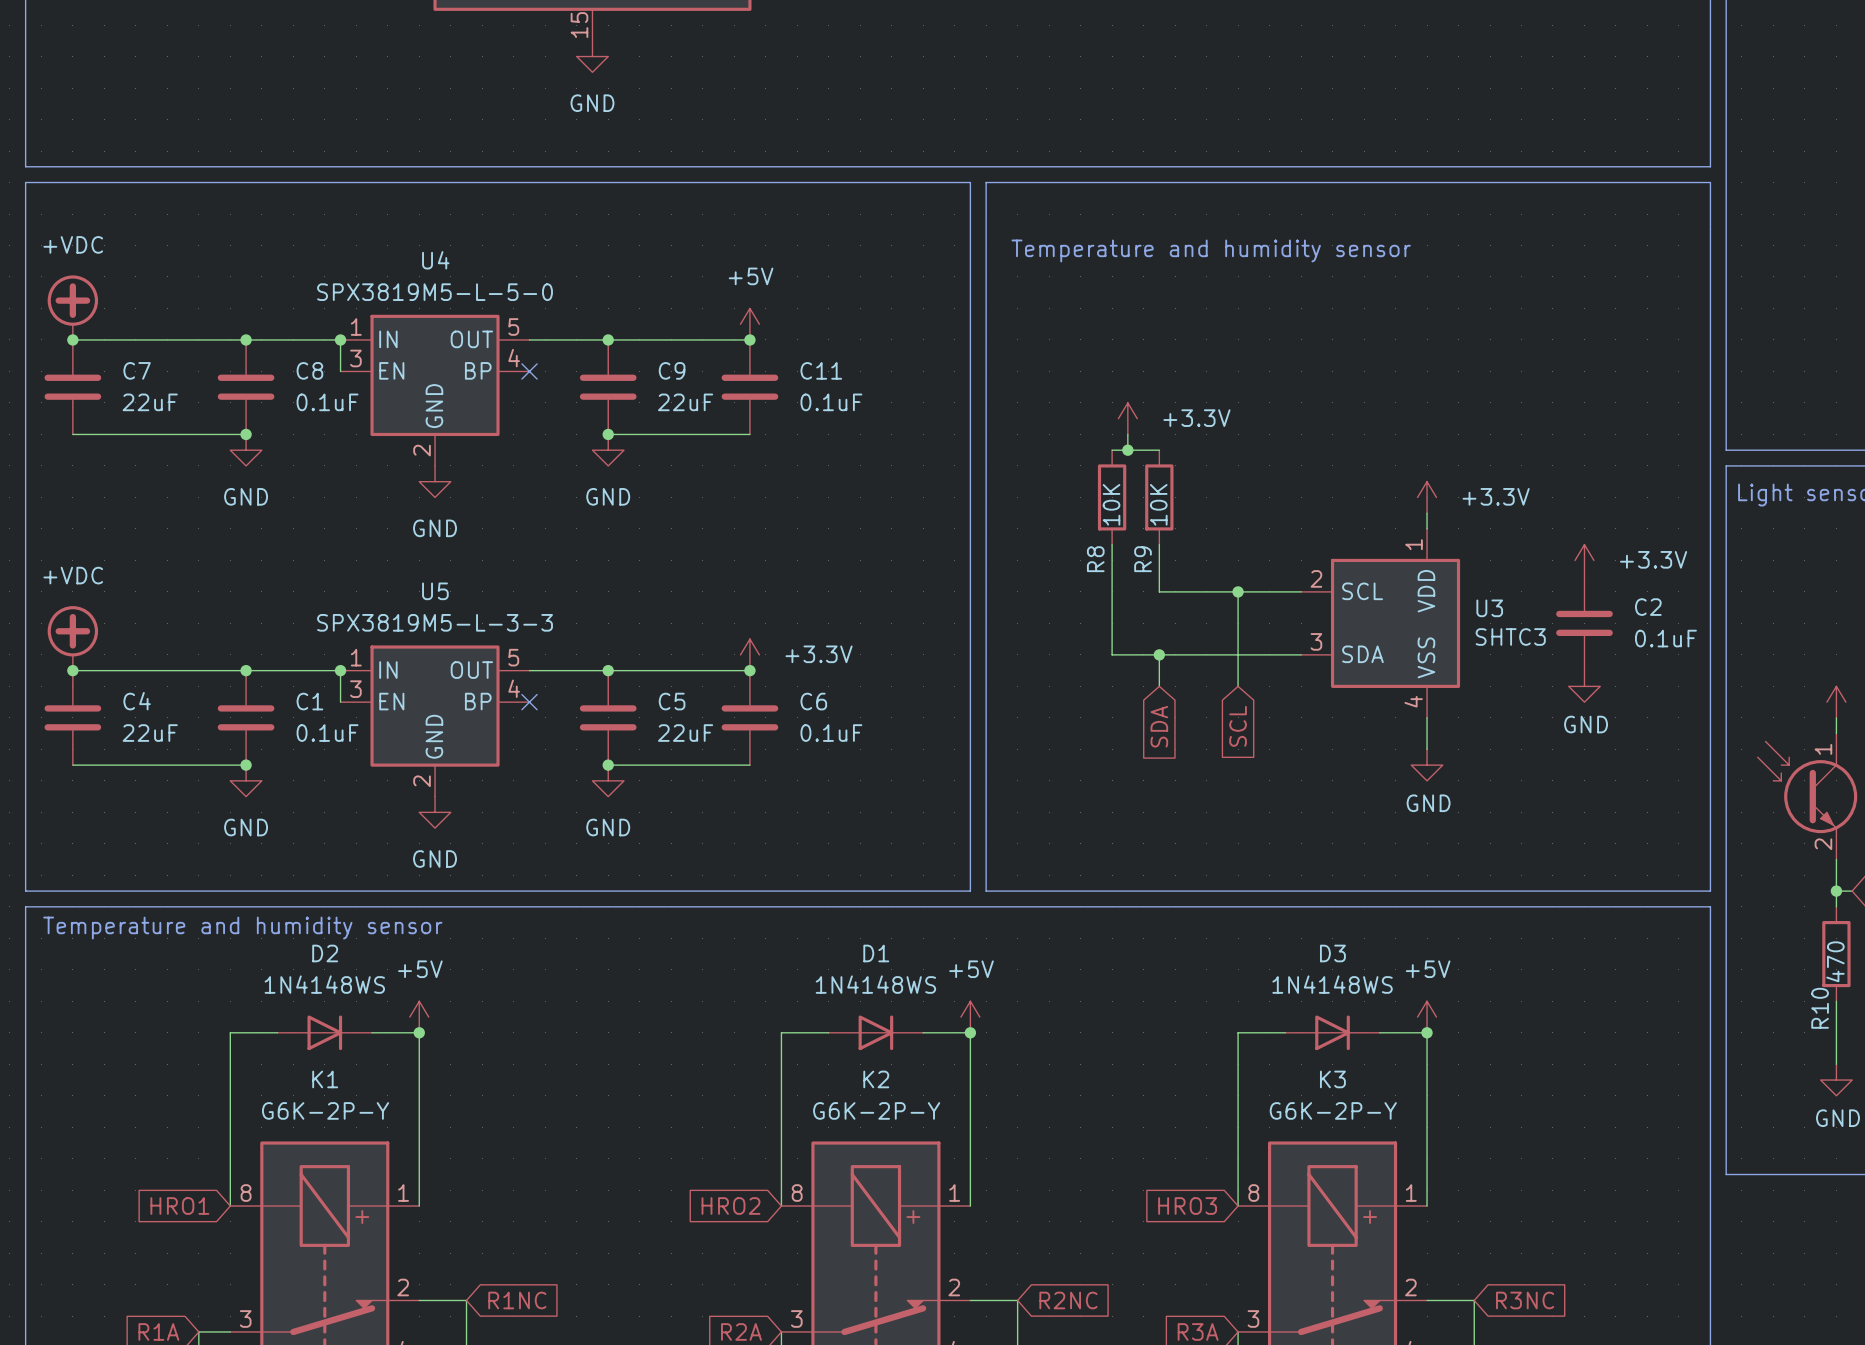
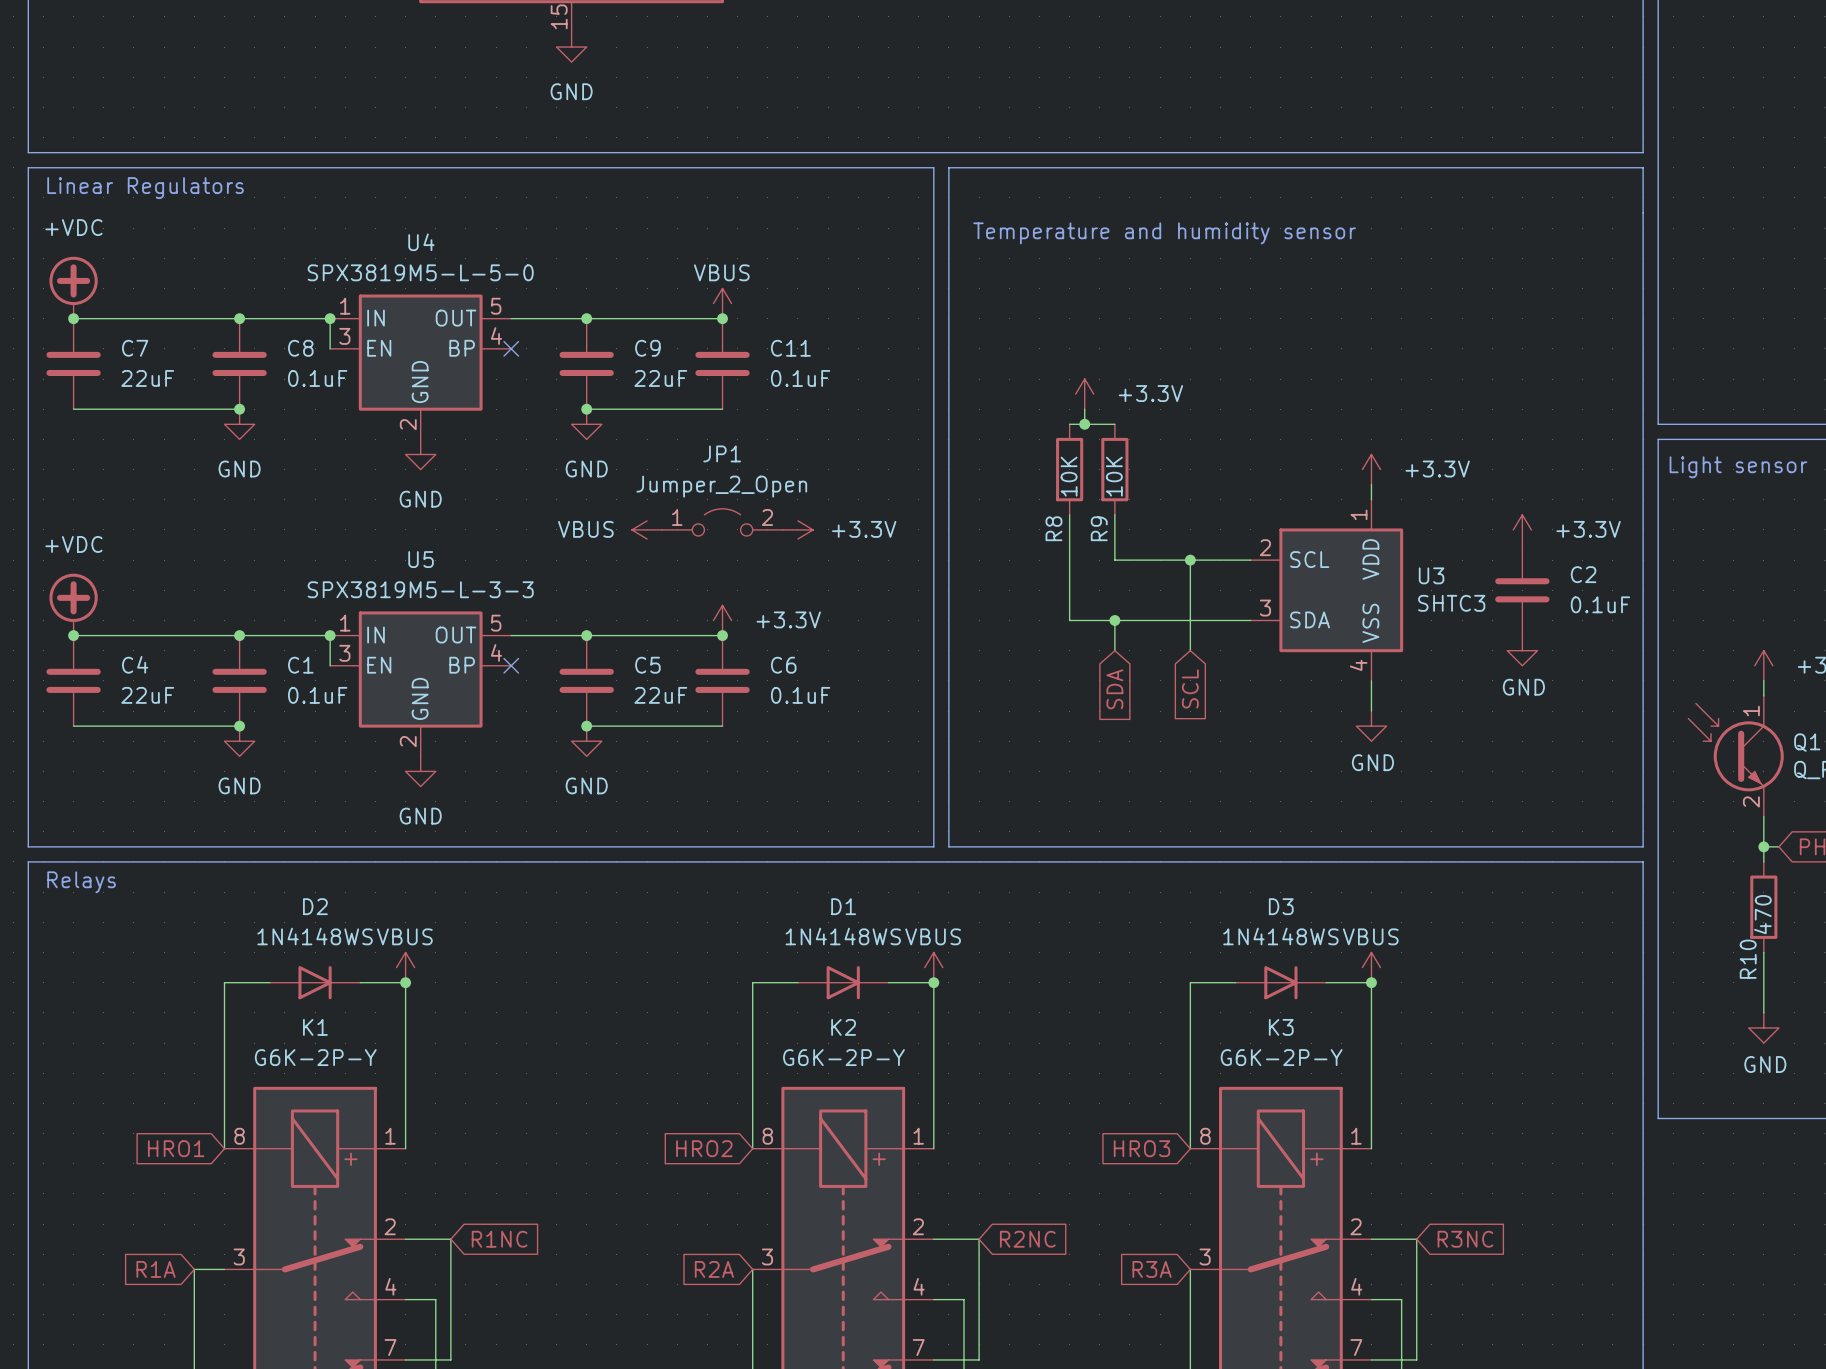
text: none -> Linear Regulators (145, 188)
power symbol: +5V (749, 324) -> VBUS (722, 303)
JP1: none -> Jumper_2_Open (722, 522)
power symbol: none -> VBUS (647, 529)
power symbol: none -> +3.3V (797, 529)
text: Temperature and humidity sensor (242, 928) -> Relays (81, 882)
power symbol: +5V (419, 1017) -> VBUS (405, 967)
power symbol: +5V (970, 1017) -> VBUS (933, 967)
power symbol: +5V (1427, 1017) -> VBUS (1371, 967)

